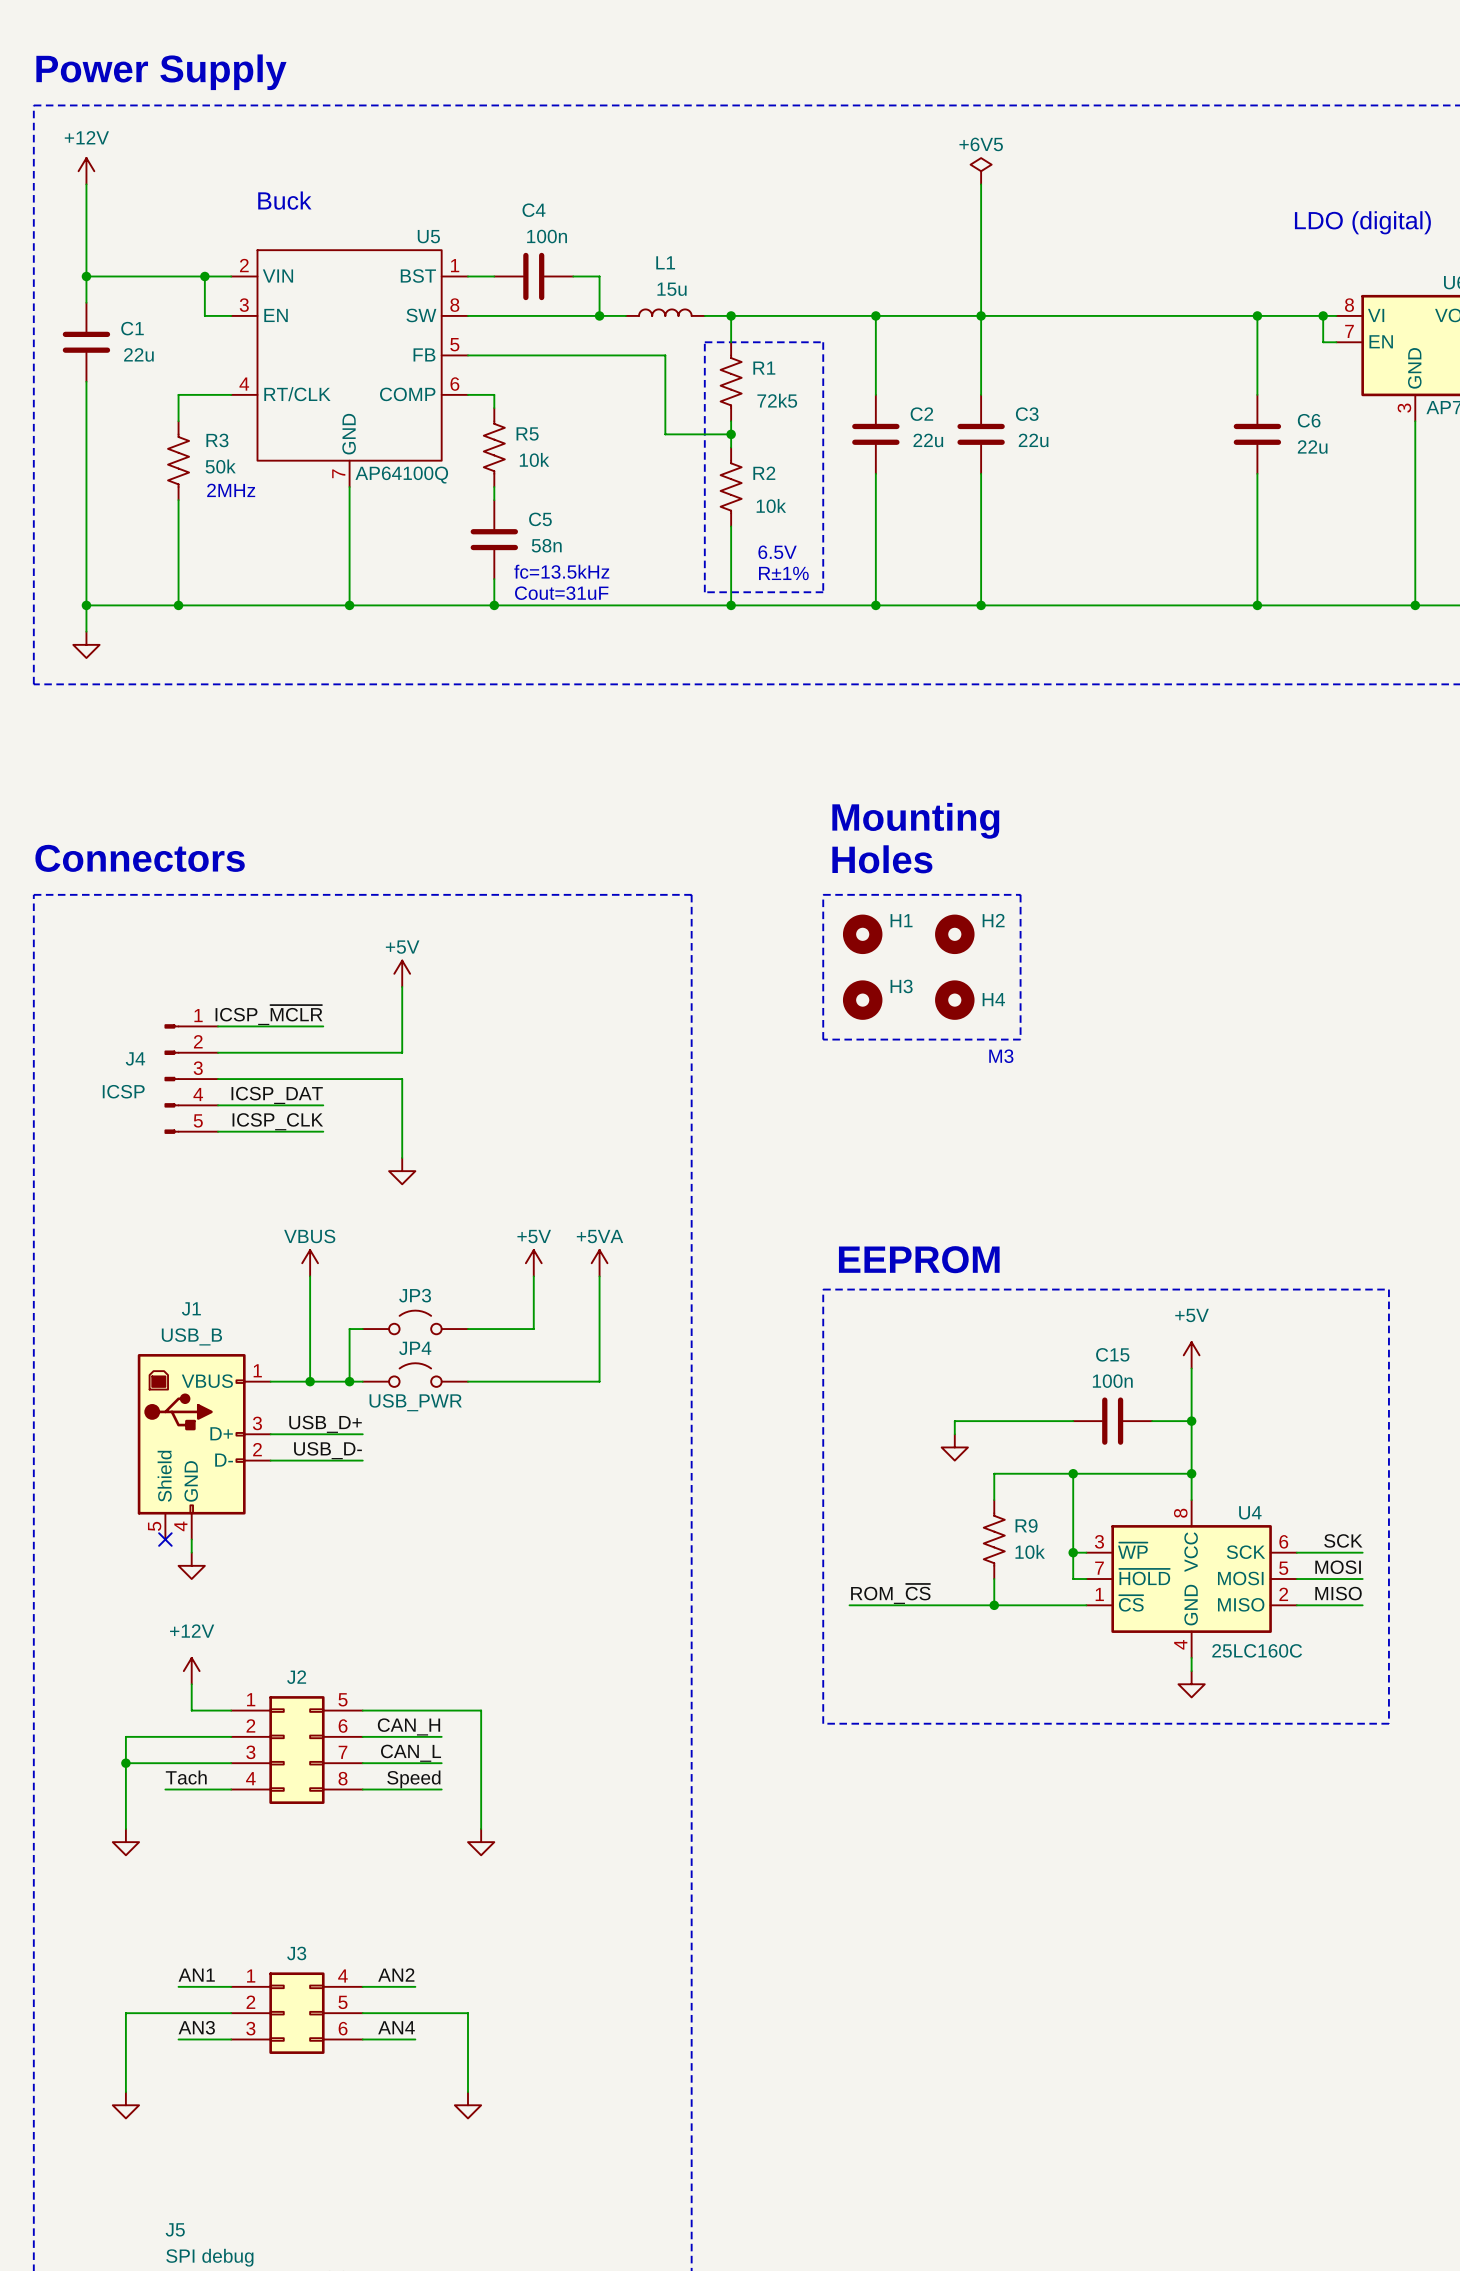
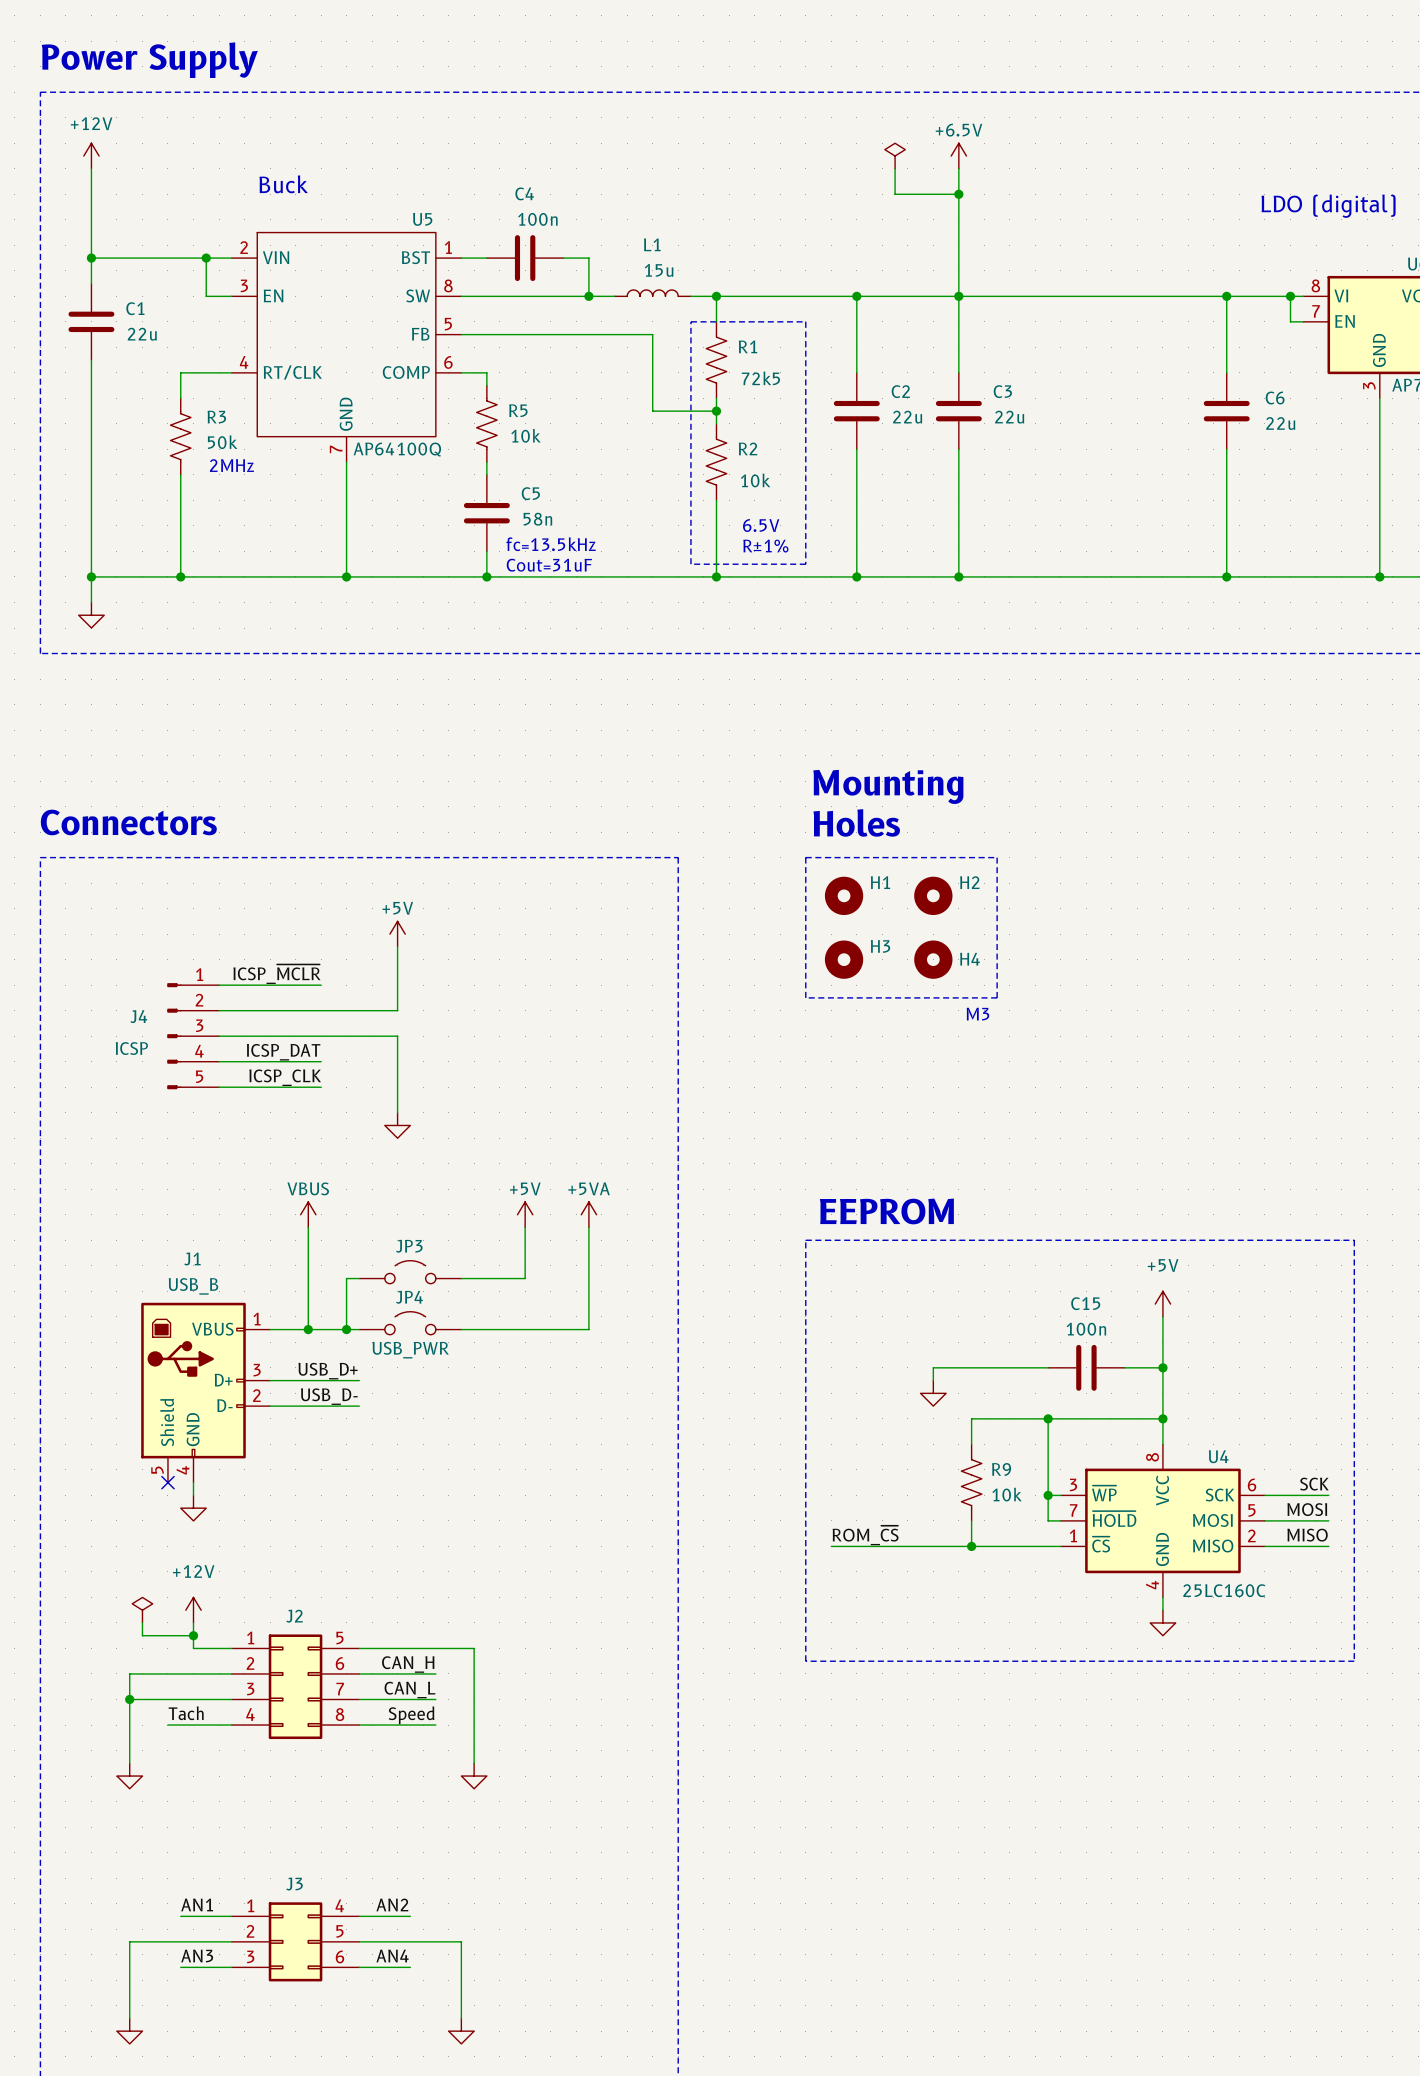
power symbol: none -> (895, 156)
power symbol: +6V5 (981, 171) -> +6.5V (958, 156)
wire: none -> (895, 168) (895, 194) (958, 194)
junction: none -> (958, 194)
power symbol: none -> (142, 1610)
wire: none -> (142, 1622) (142, 1635) (193, 1635)
junction: none -> (193, 1635)

